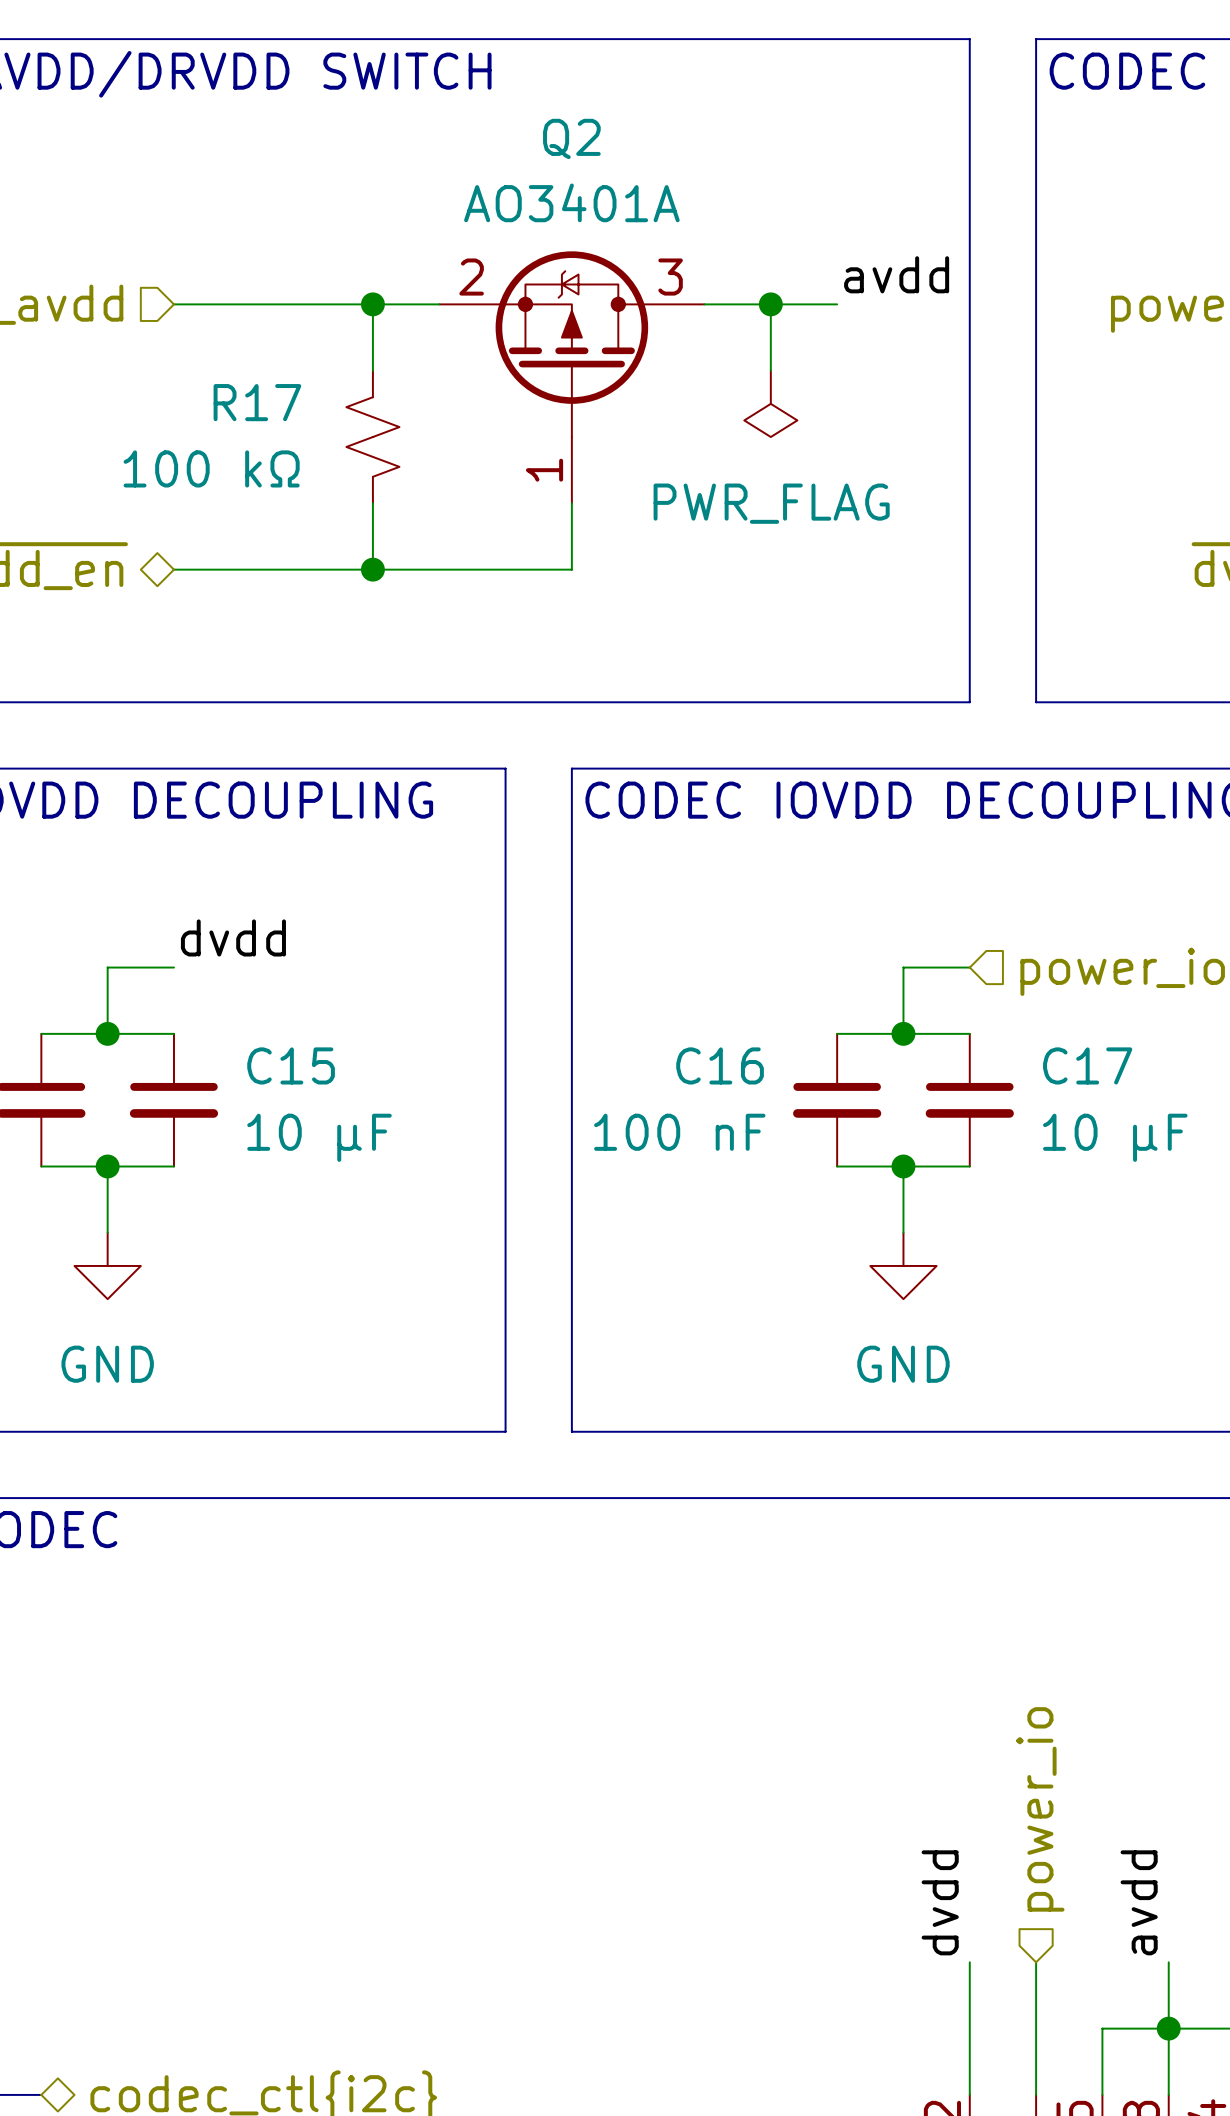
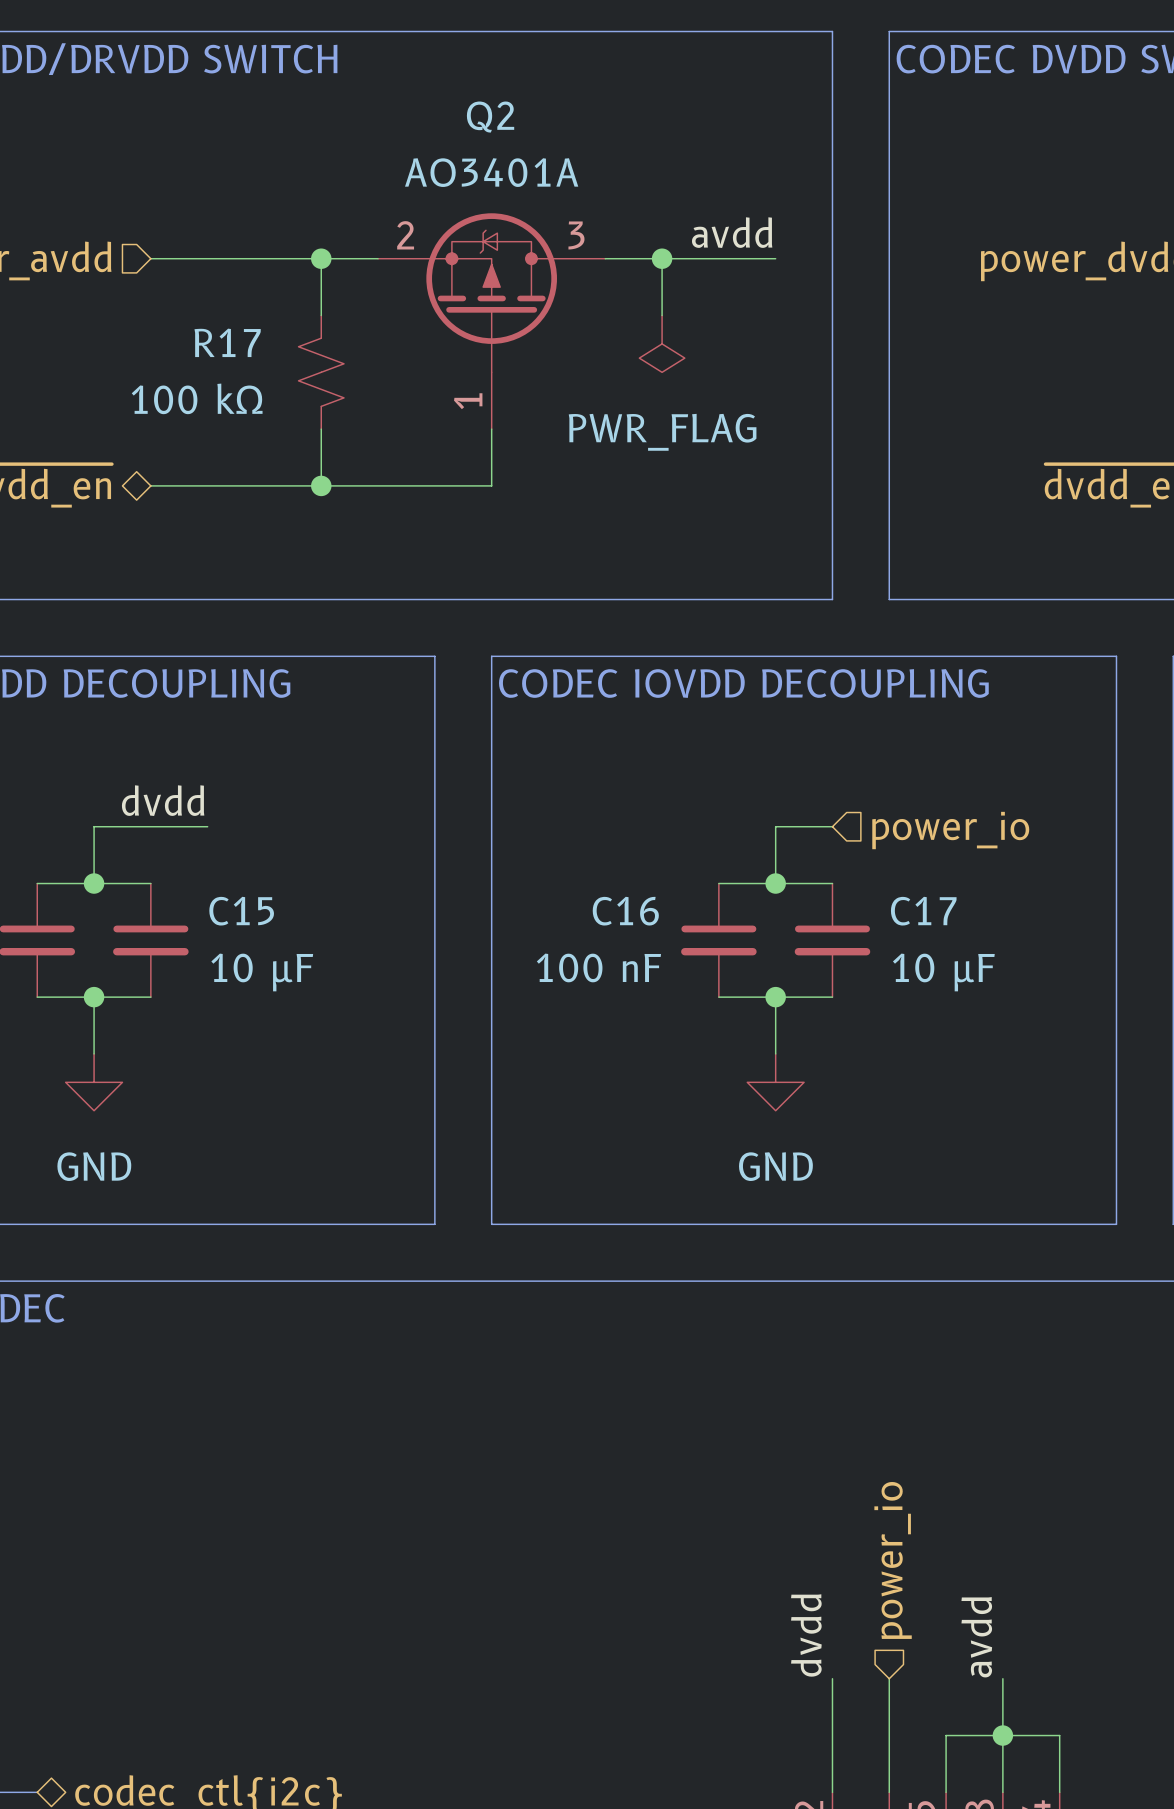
label position: avdd (896, 274) -> avdd (732, 232)
wire: none -> (718, 258) (775, 258)
label position: dvdd (233, 937) -> dvdd (163, 800)
wire: none -> (150, 826) (207, 826)

